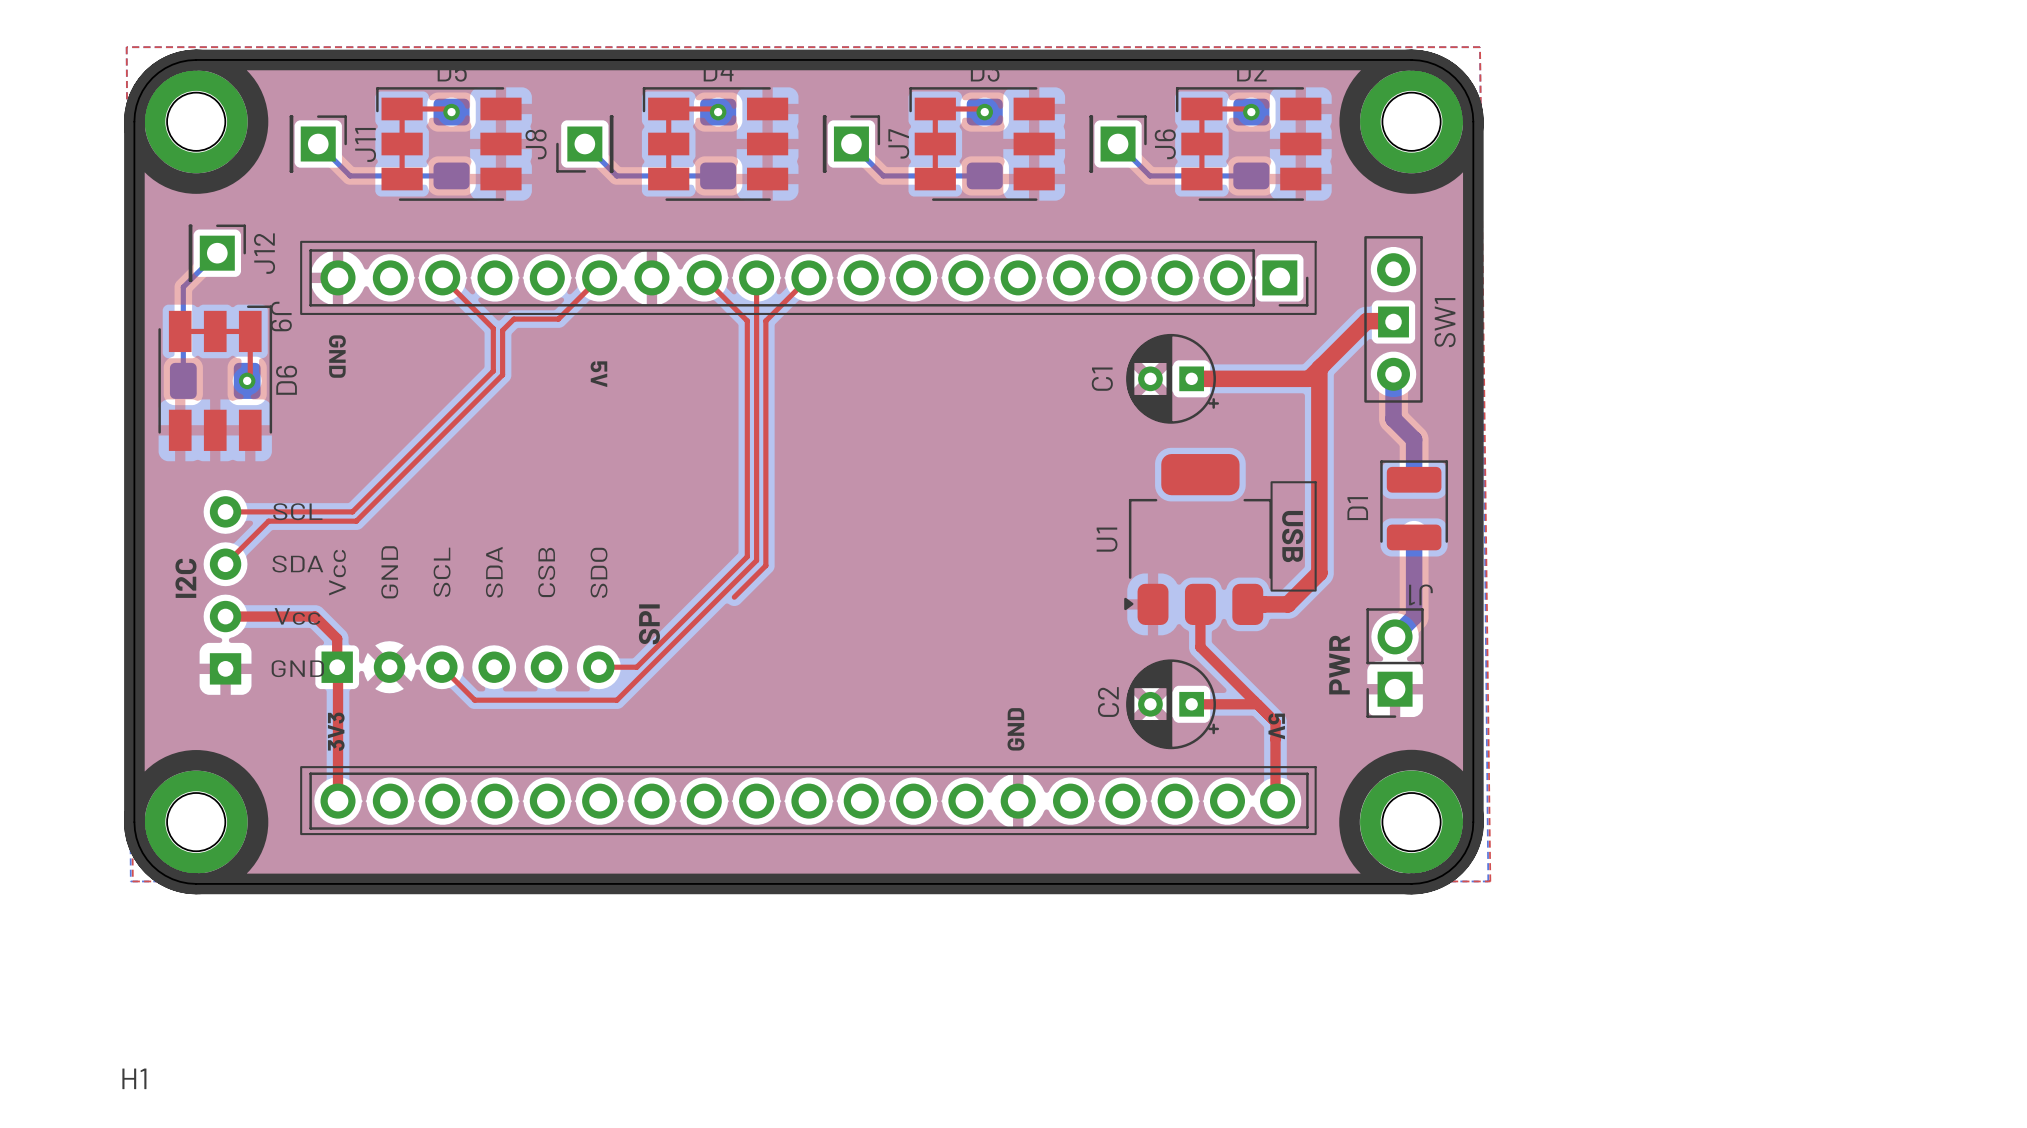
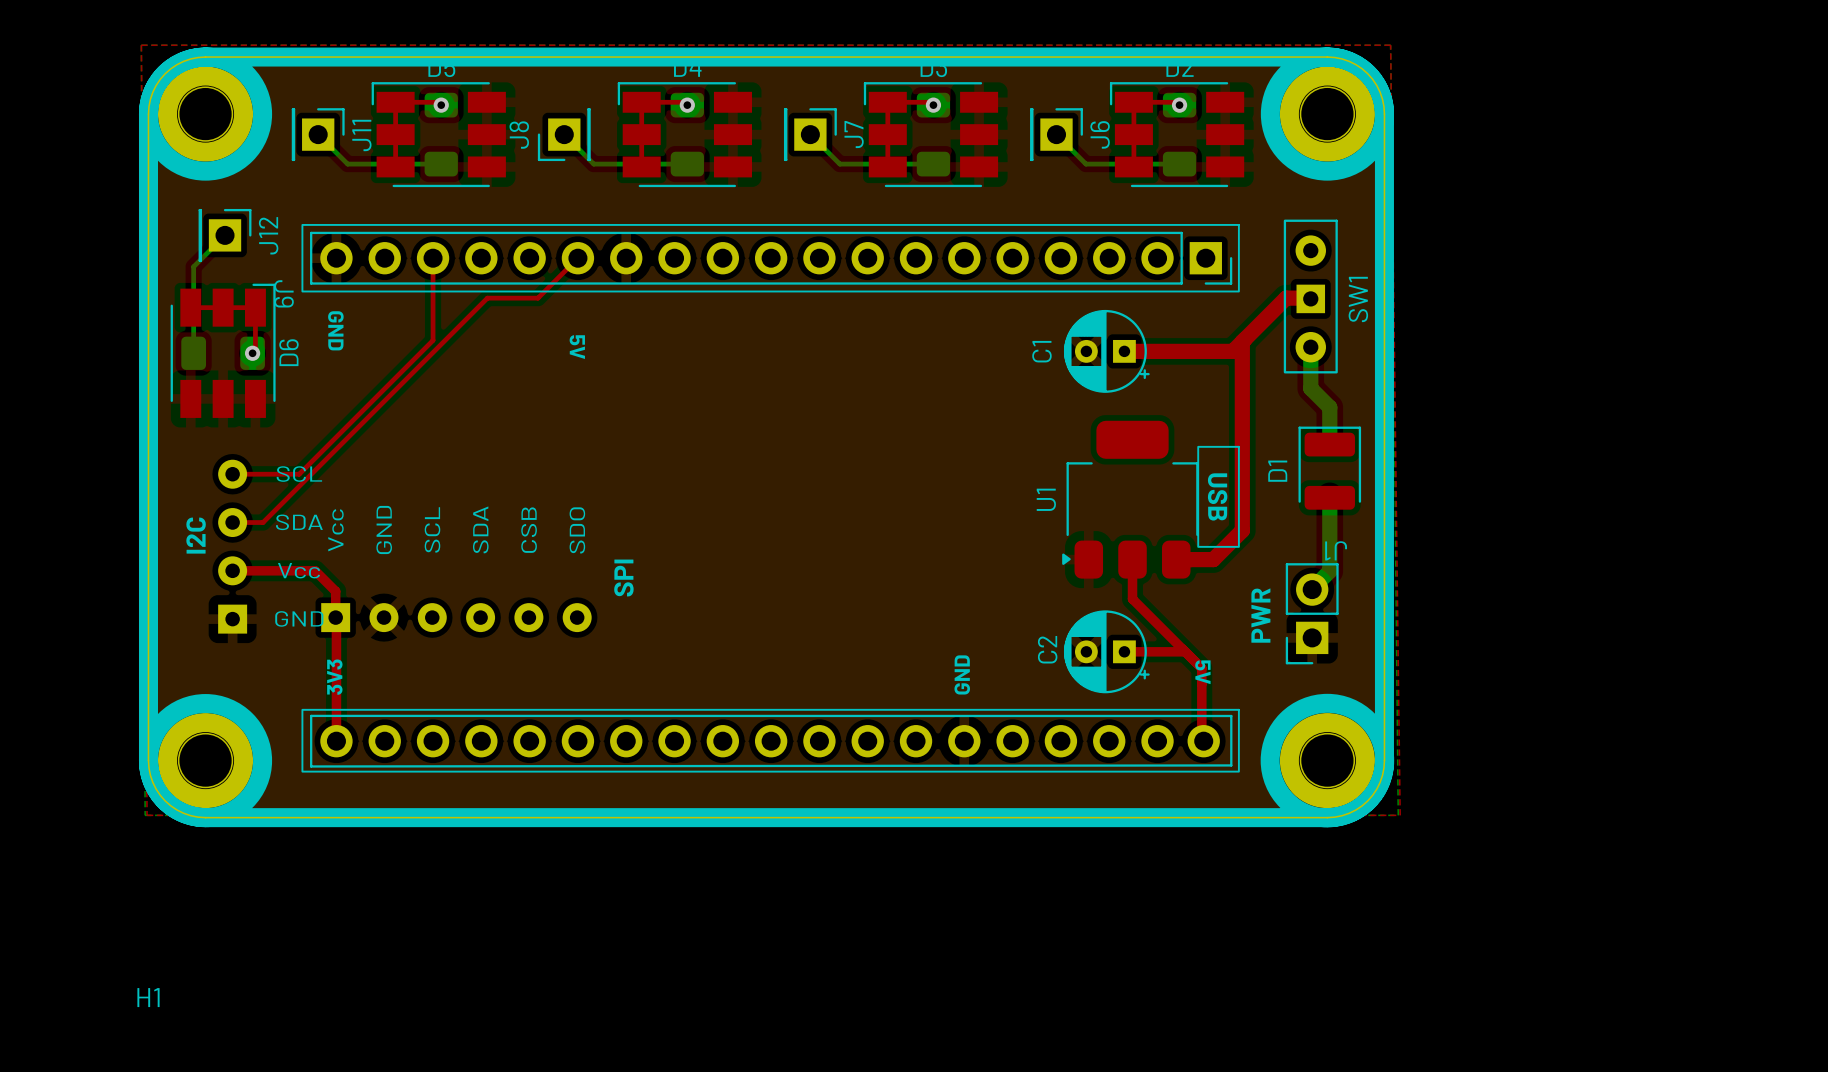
top track: (442, 277) (493, 328) (493, 371) (352, 511) (297, 511) -> (433, 258) (433, 340) (299, 474)
top track: (704, 277) (747, 320) (747, 556) (636, 667) (598, 667) -> none
top track: (756, 277) (756, 560) (616, 700) (474, 700) (441, 667) -> none
top track: (808, 277) (765, 320) (765, 565) (734, 597) -> none
top track: (558, 319) (513, 319) (502, 330) (502, 374) (356, 521) (268, 521) (225, 564) -> (539, 296) (538, 298) (487, 298) (263, 522) (232, 522)

